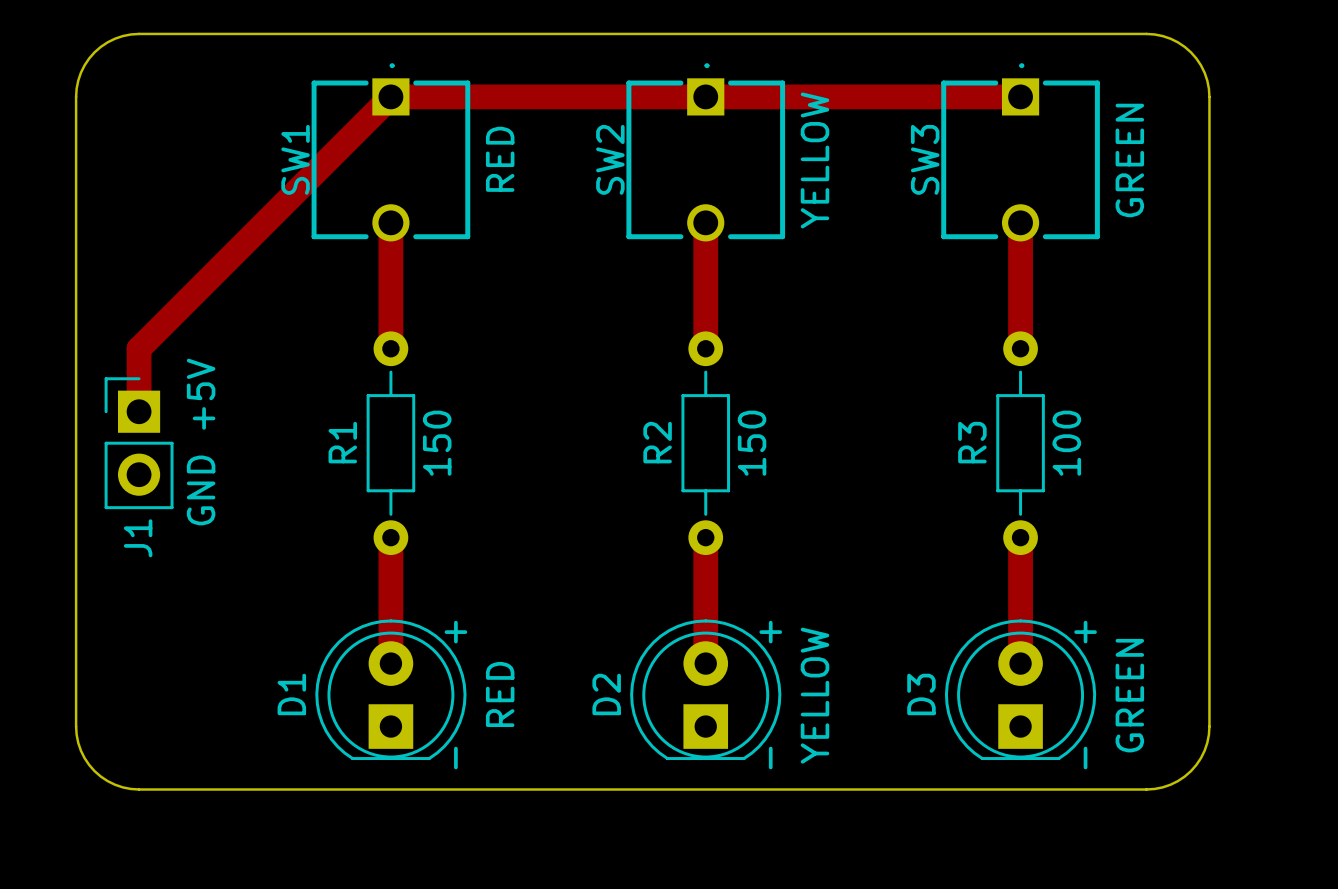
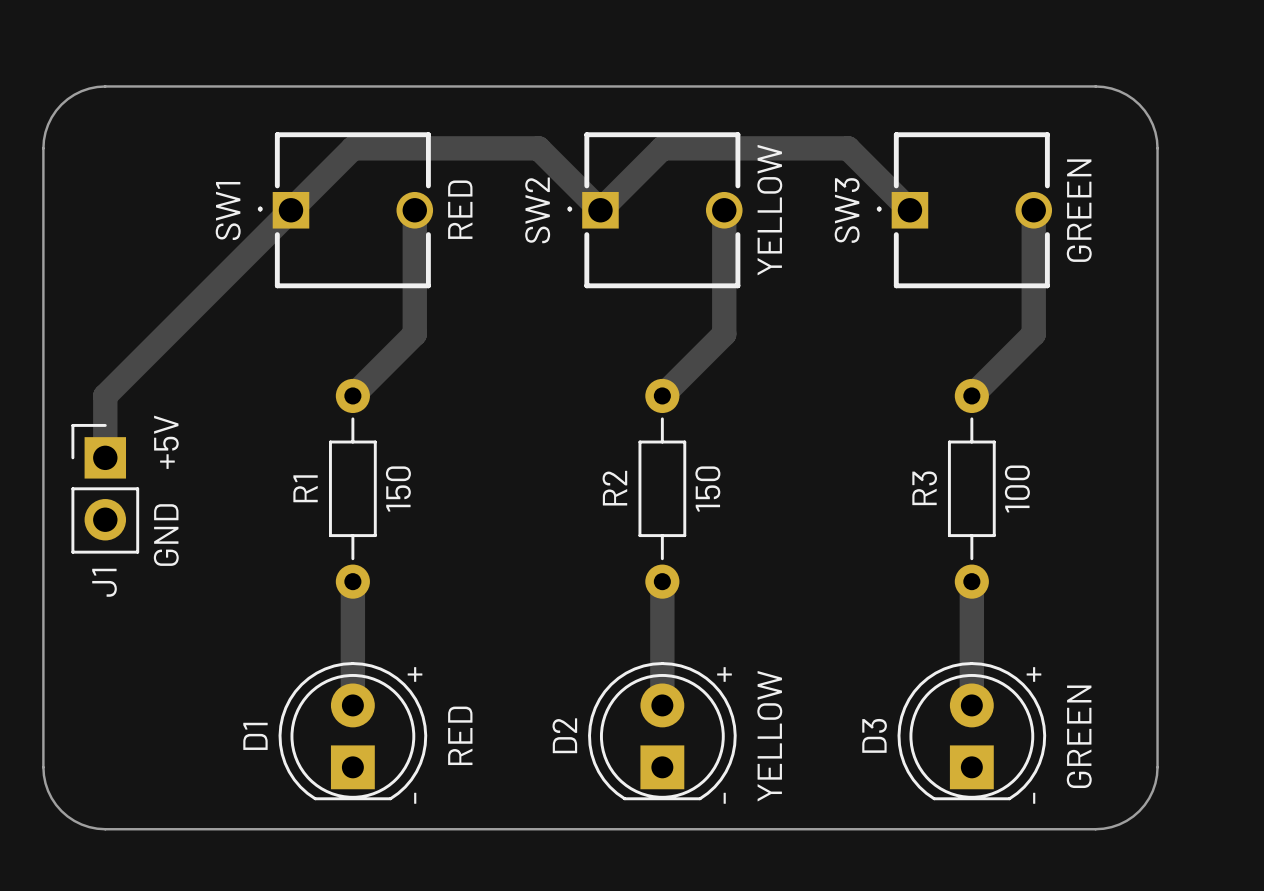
track: (579, 96) (705, 96) -> (538, 148) (600, 210) (662, 148)
track: (894, 96) (1020, 96) -> (848, 148) (909, 210)
SW1 rotation: 0° (390, 152) -> 90° counterclockwise (345, 210)
SW2 rotation: 0° (705, 152) -> 90° counterclockwise (654, 210)
SW3 rotation: 0° (1020, 152) -> 90° counterclockwise (964, 210)
track: (390, 222) (390, 348) -> (414, 210) (414, 334) (352, 395)
track: (705, 222) (705, 348) -> (724, 210) (724, 334) (662, 395)
track: (1020, 222) (1020, 348) -> (1033, 210) (1033, 334) (971, 395)

